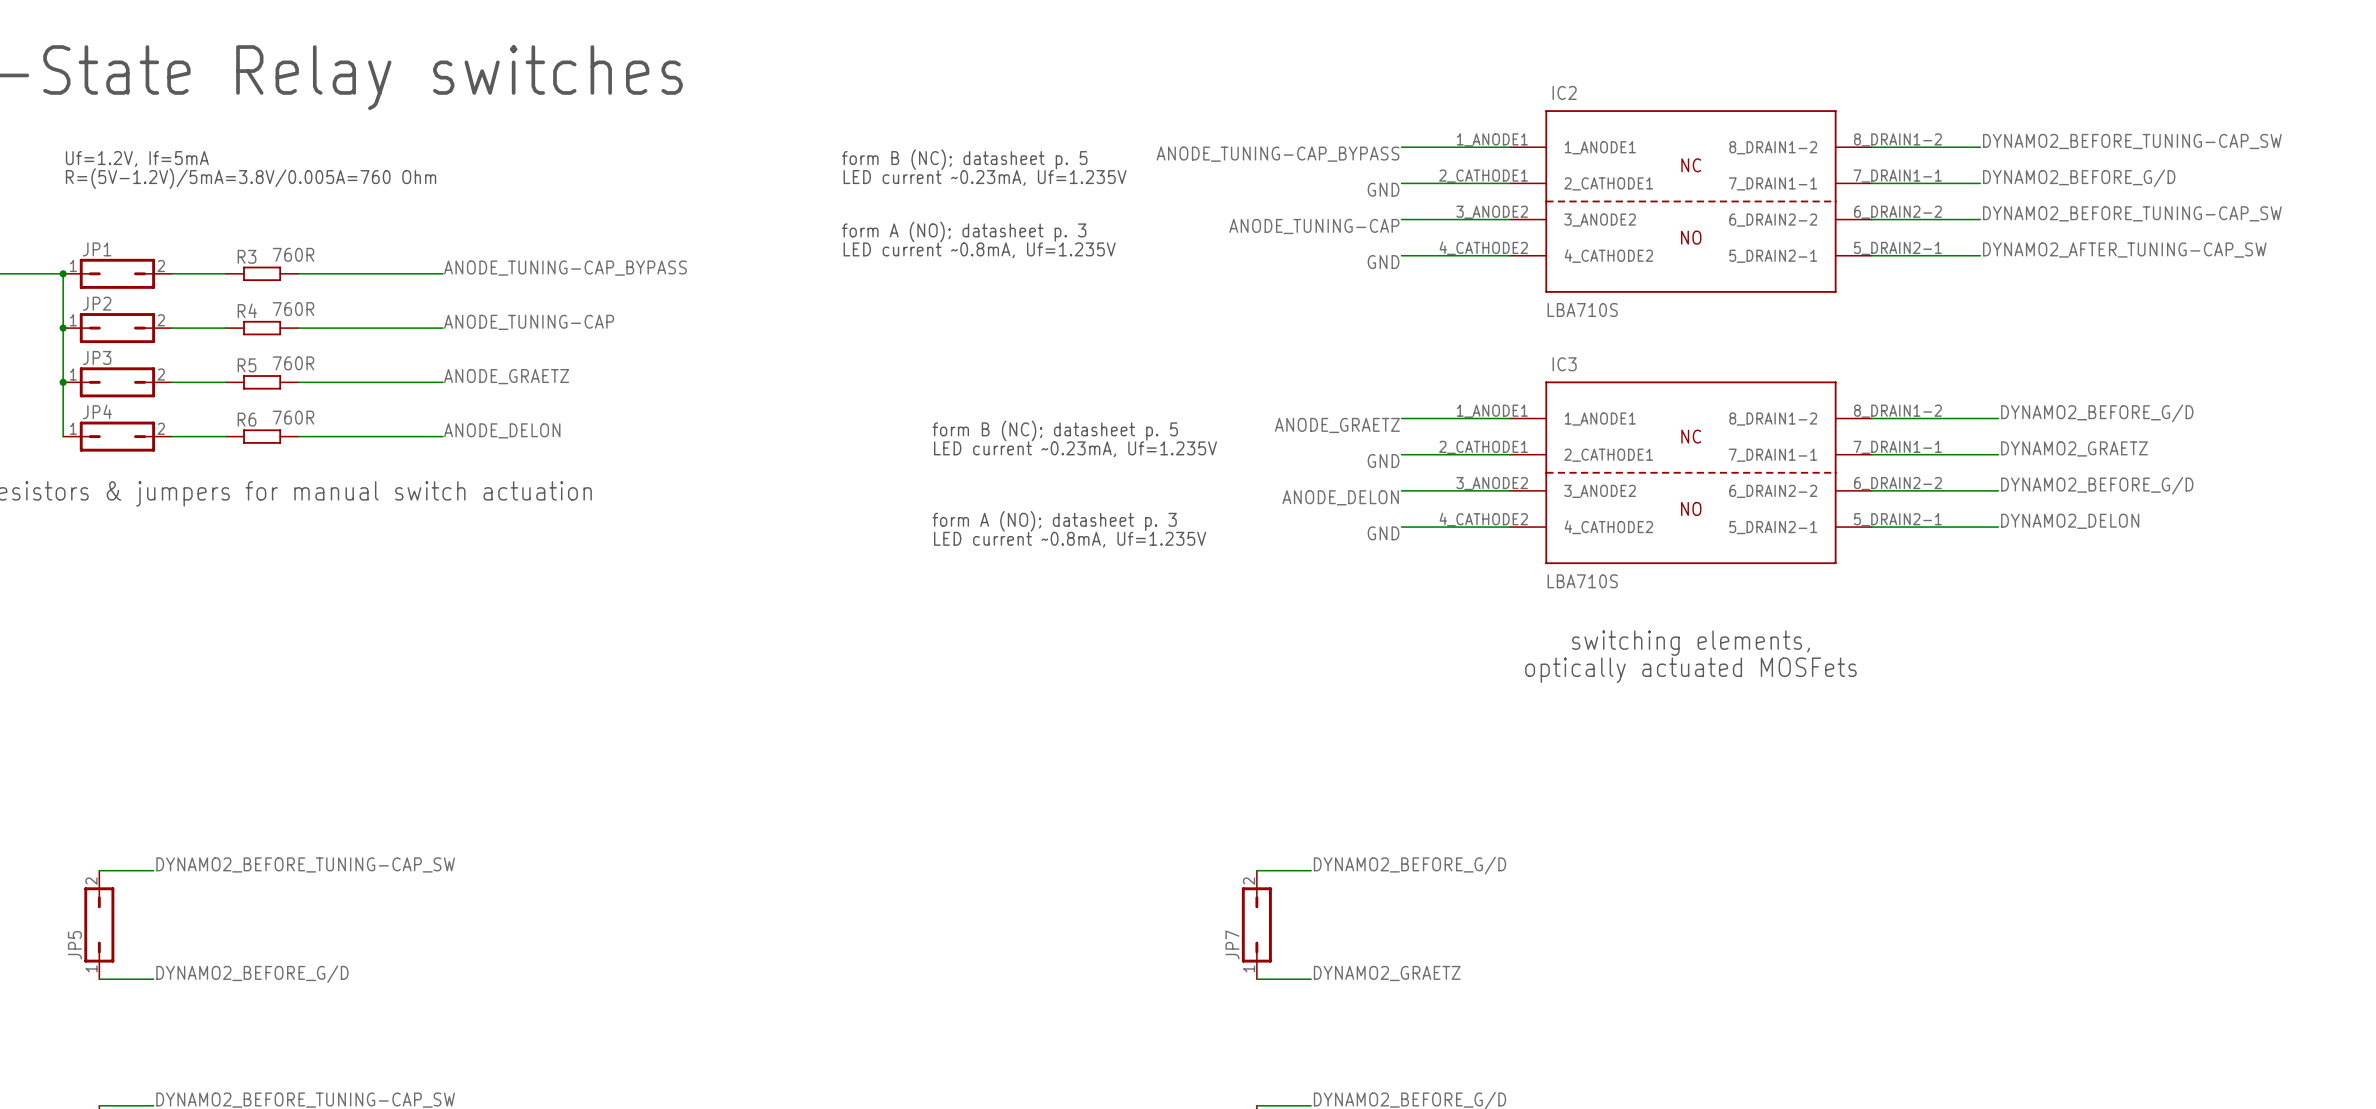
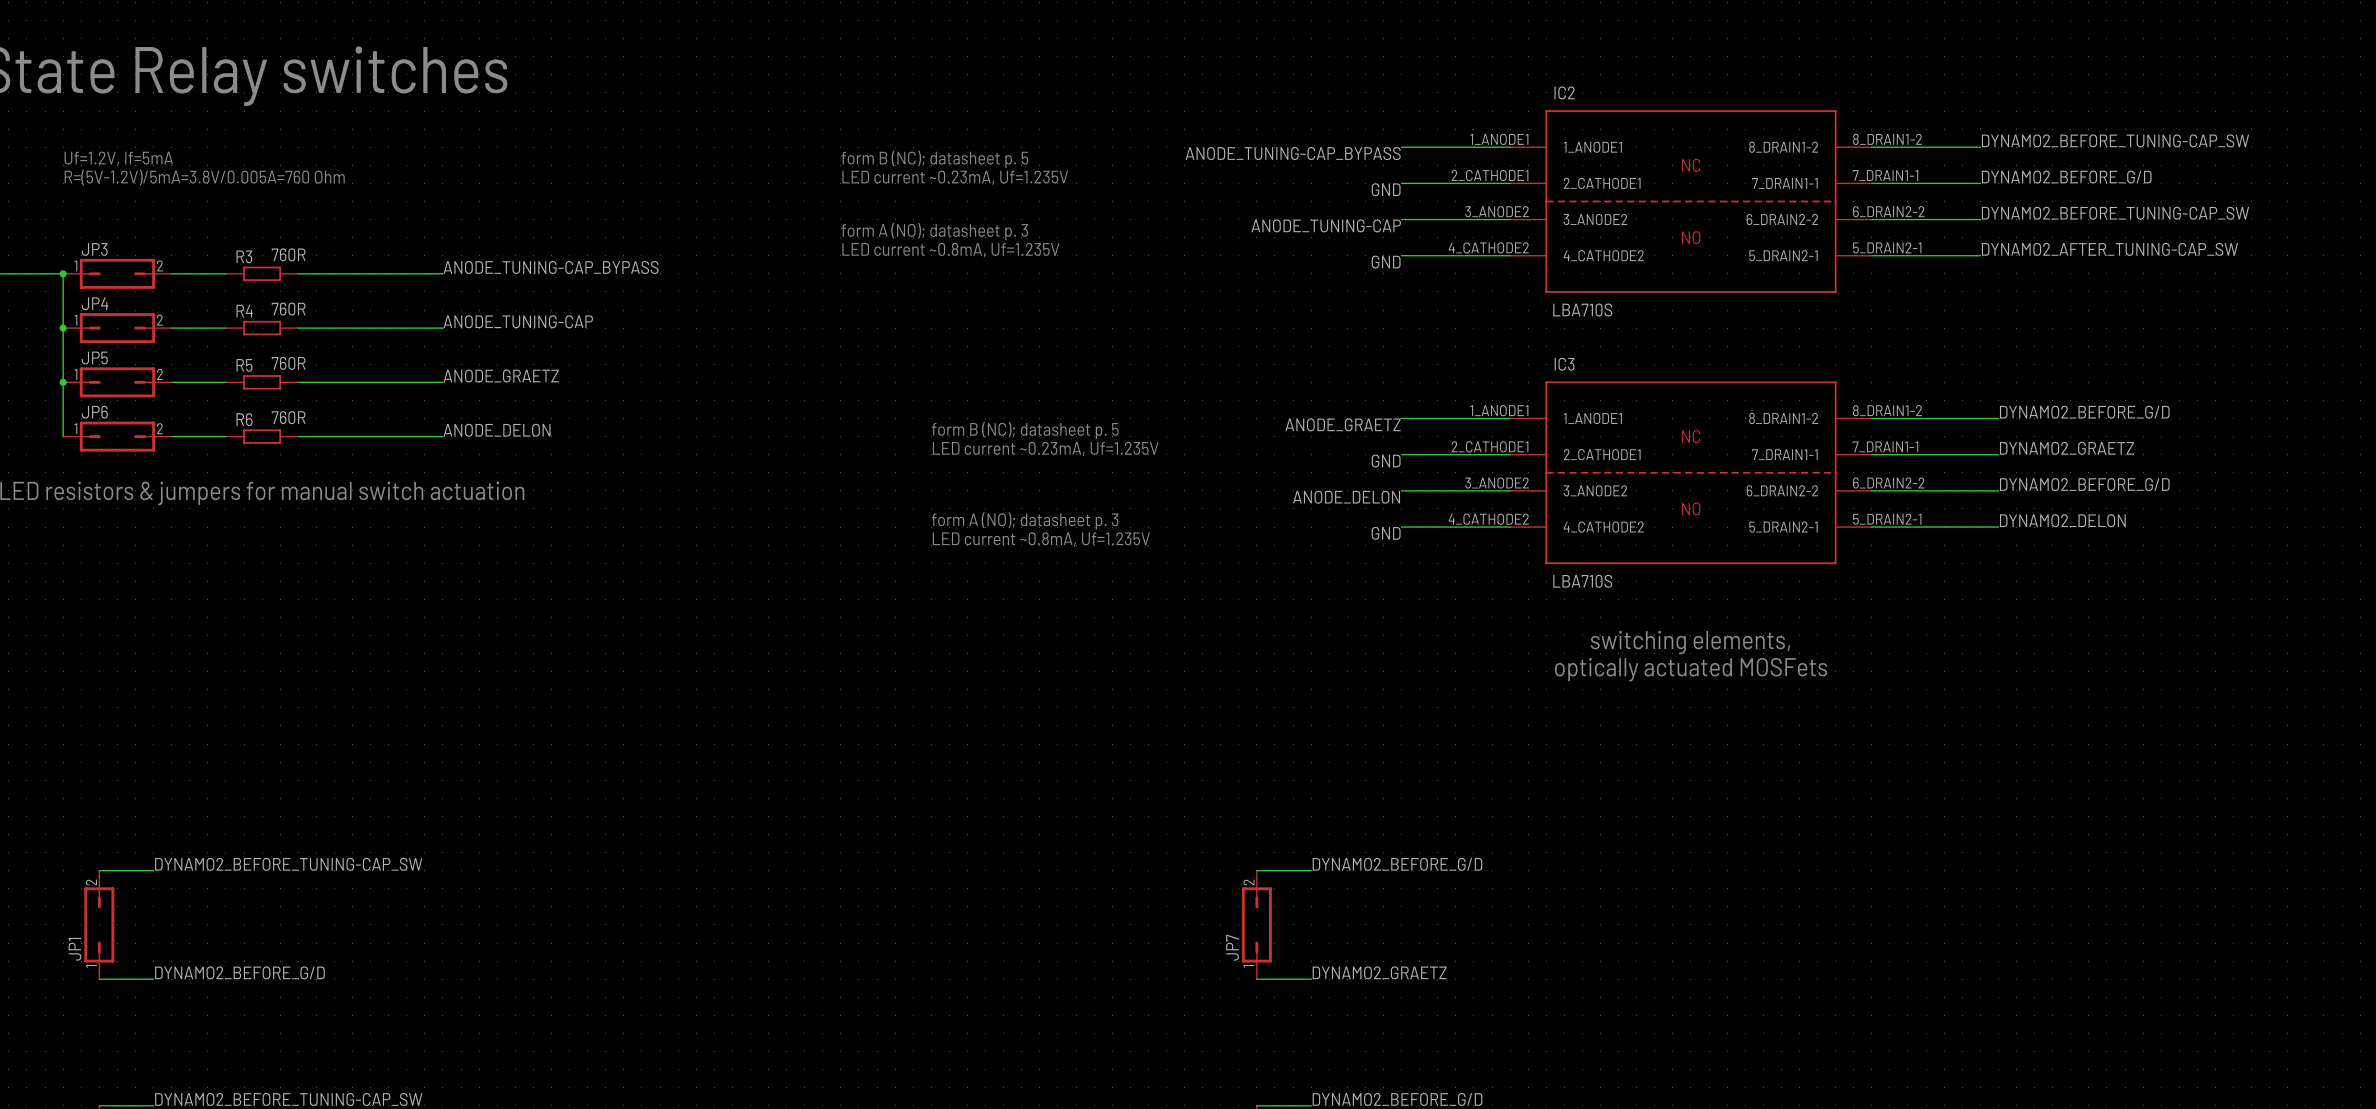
JP1 name: JP1 (97, 249) -> JP3 (94, 249)
JP2 name: JP2 (97, 303) -> JP4 (94, 303)
JP3 name: JP3 (97, 357) -> JP5 (94, 357)
JP4 name: JP4 (97, 411) -> JP6 (94, 412)
JP5 name: JP5 (74, 945) -> JP1 (74, 949)

